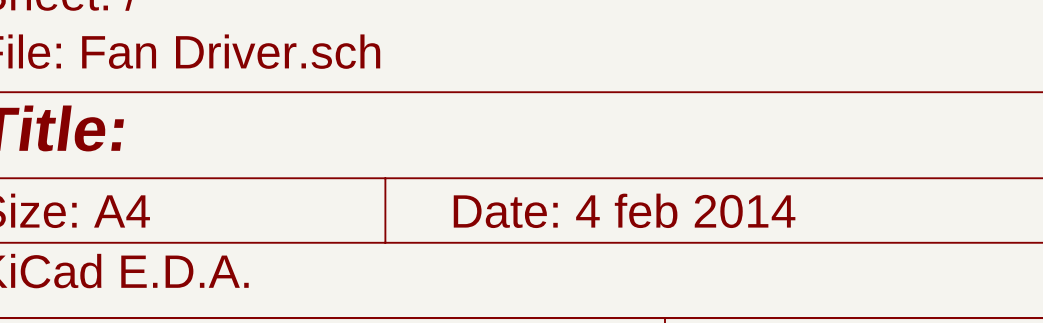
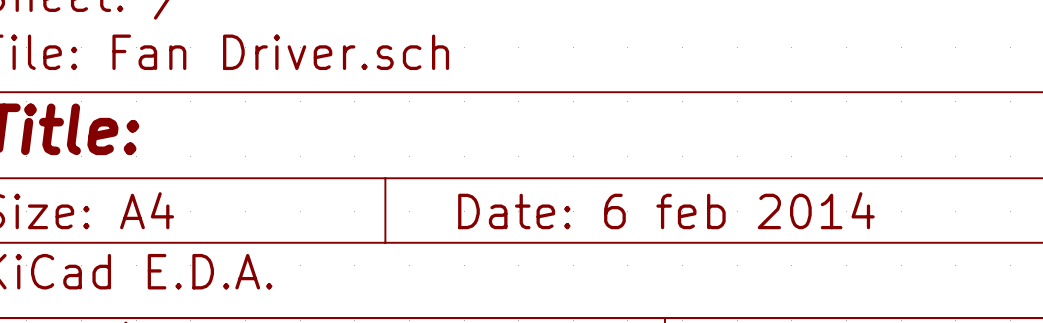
title block: Date: 4 feb 2014 (624, 210) -> Date: 6 feb 2014 (666, 210)

